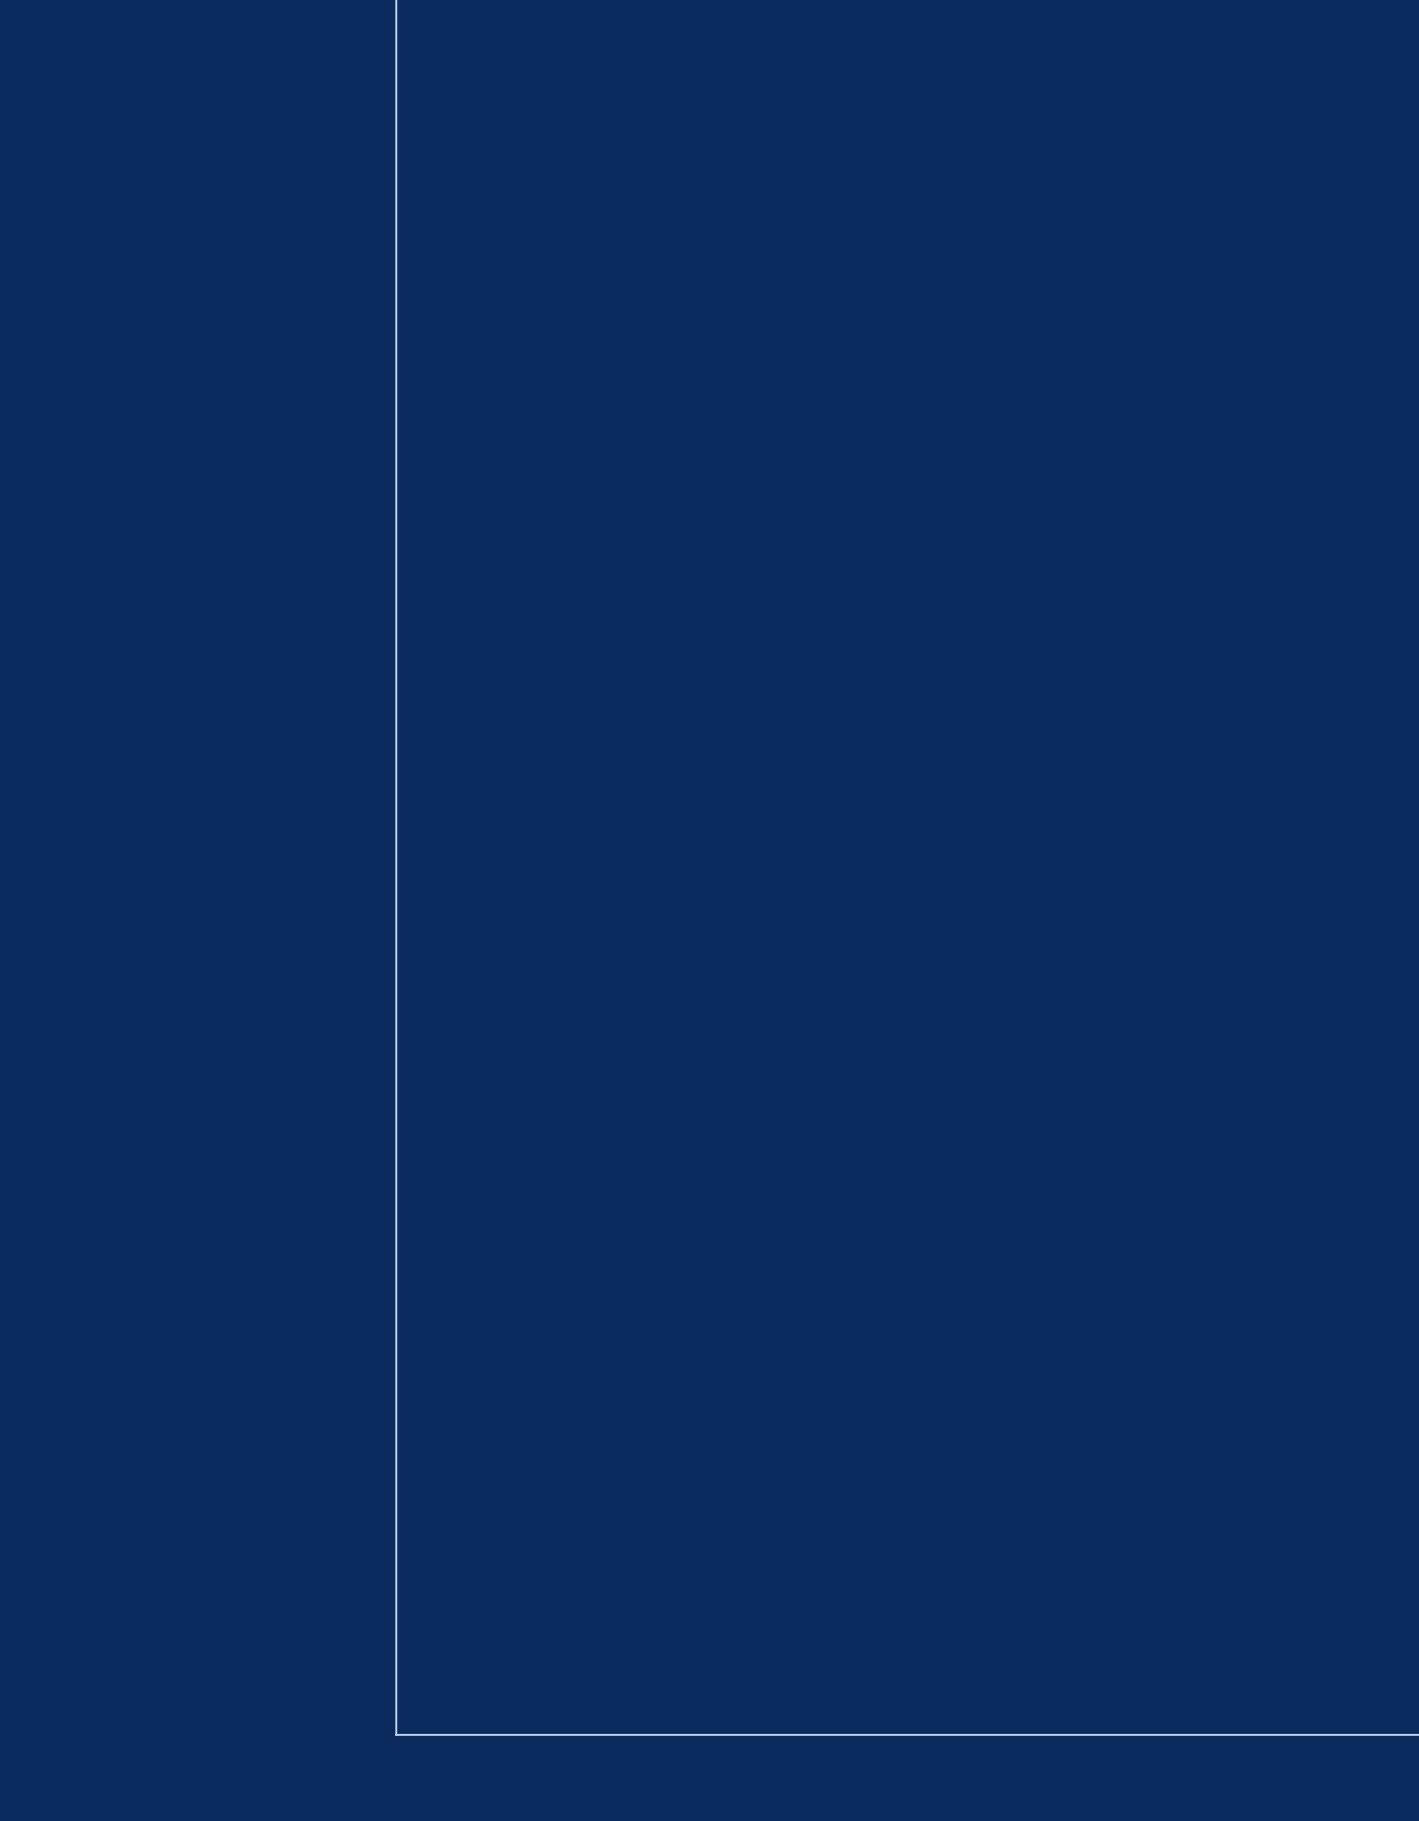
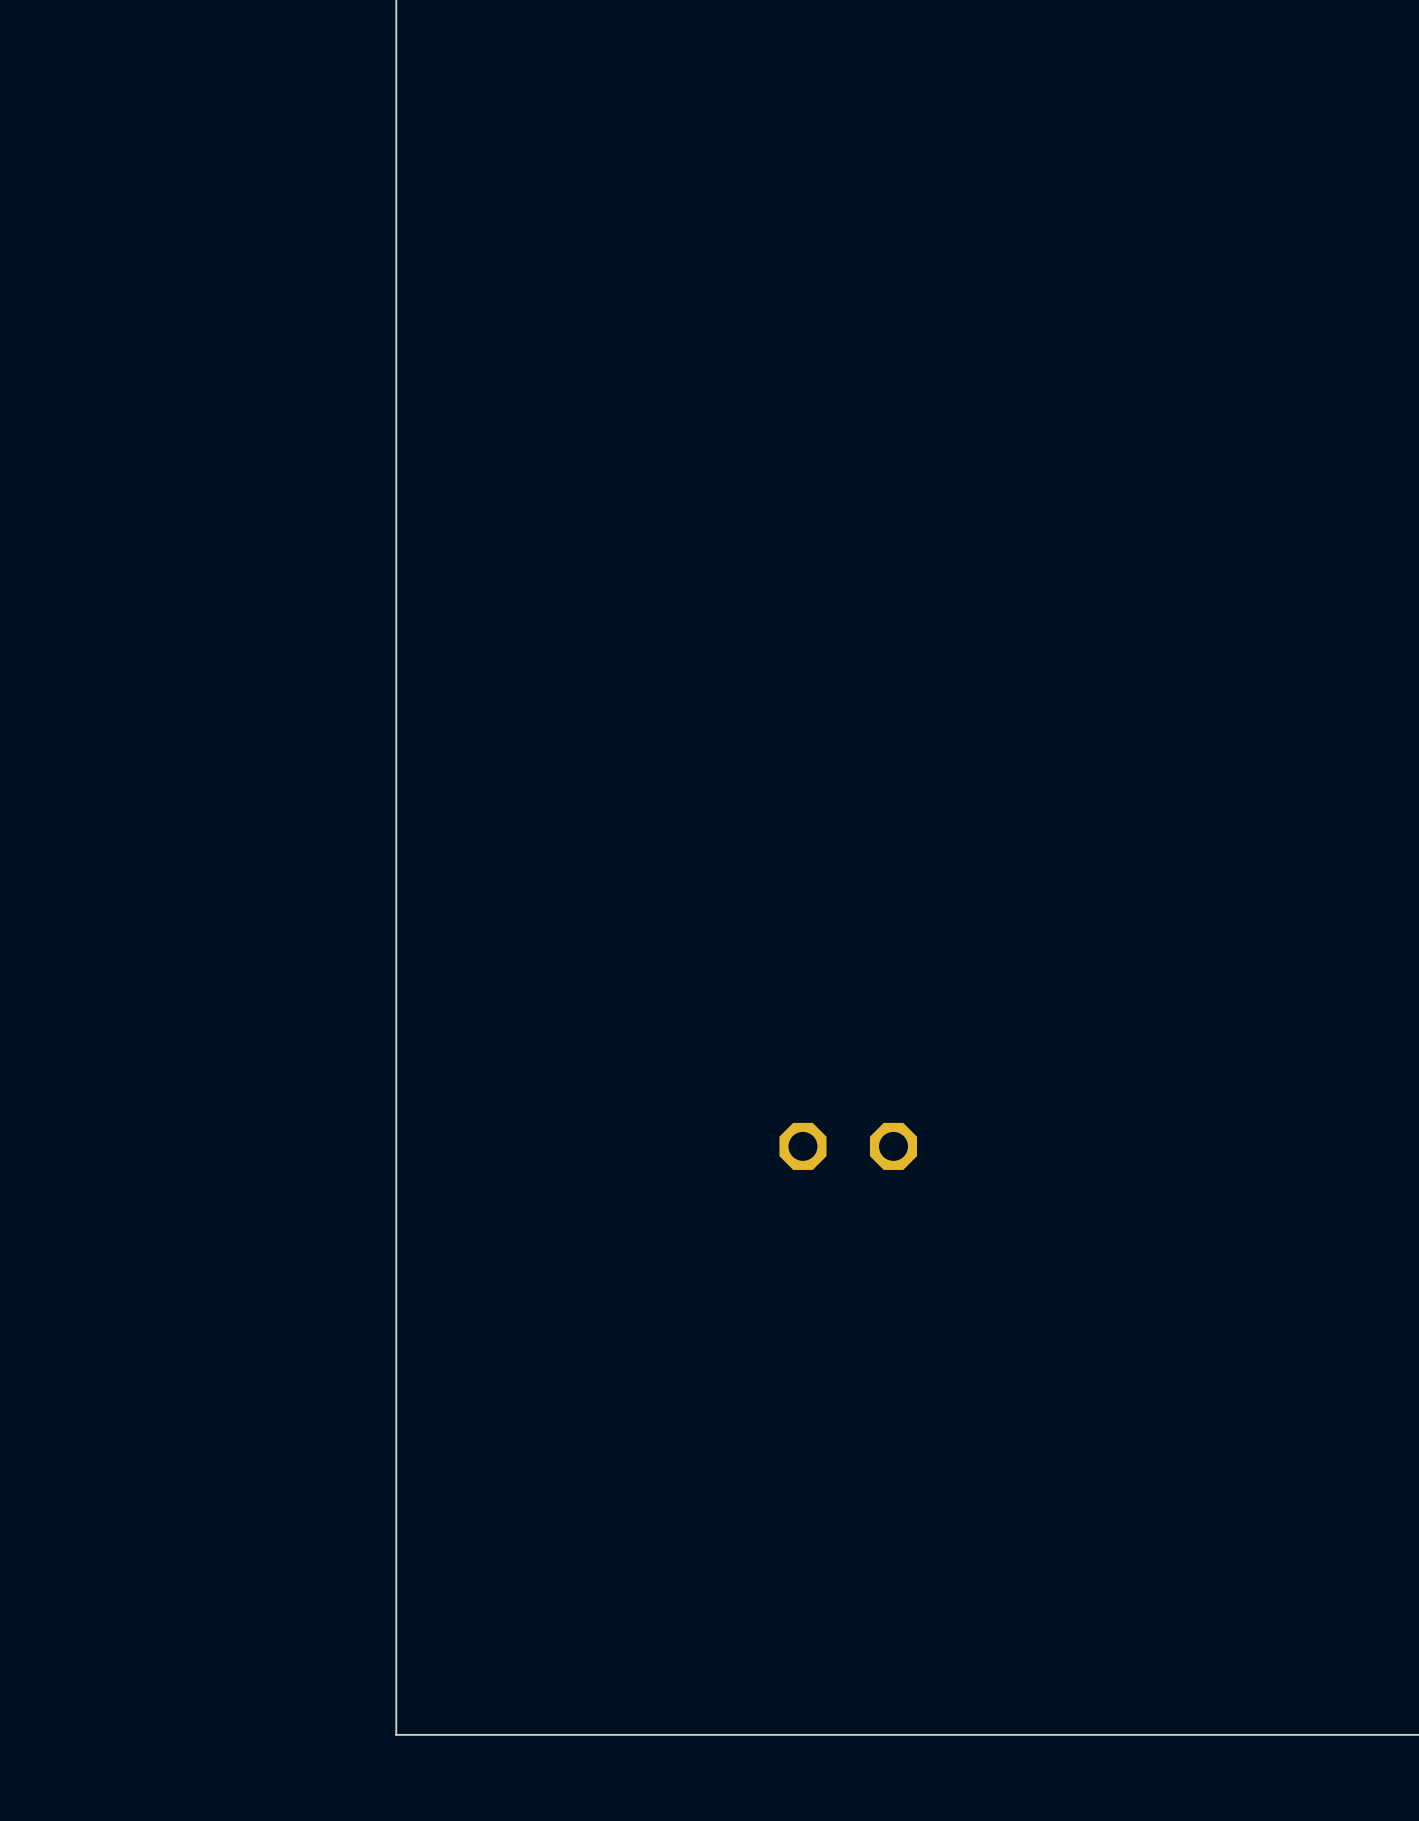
part: none -> (848, 1146)

